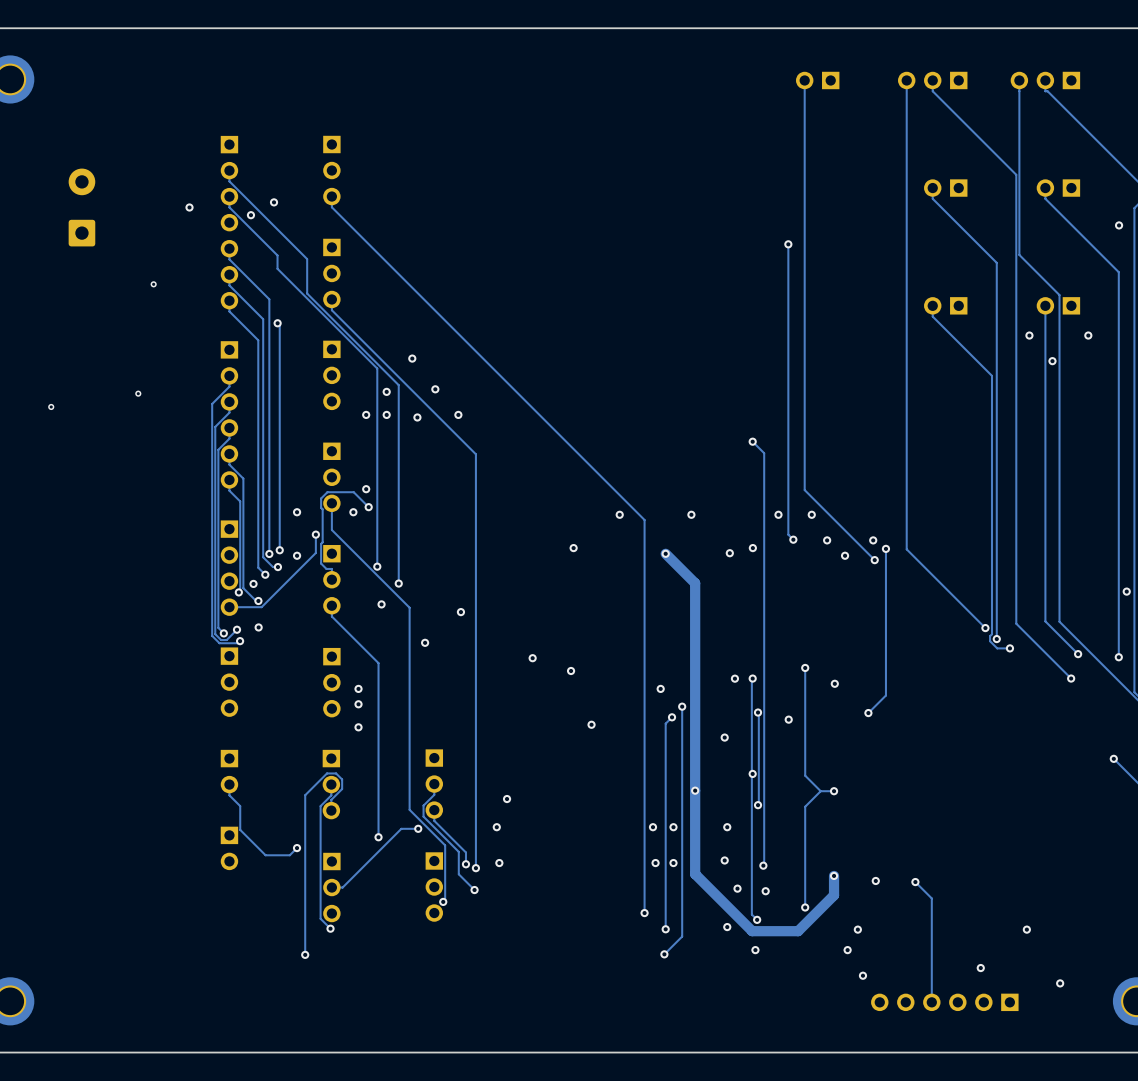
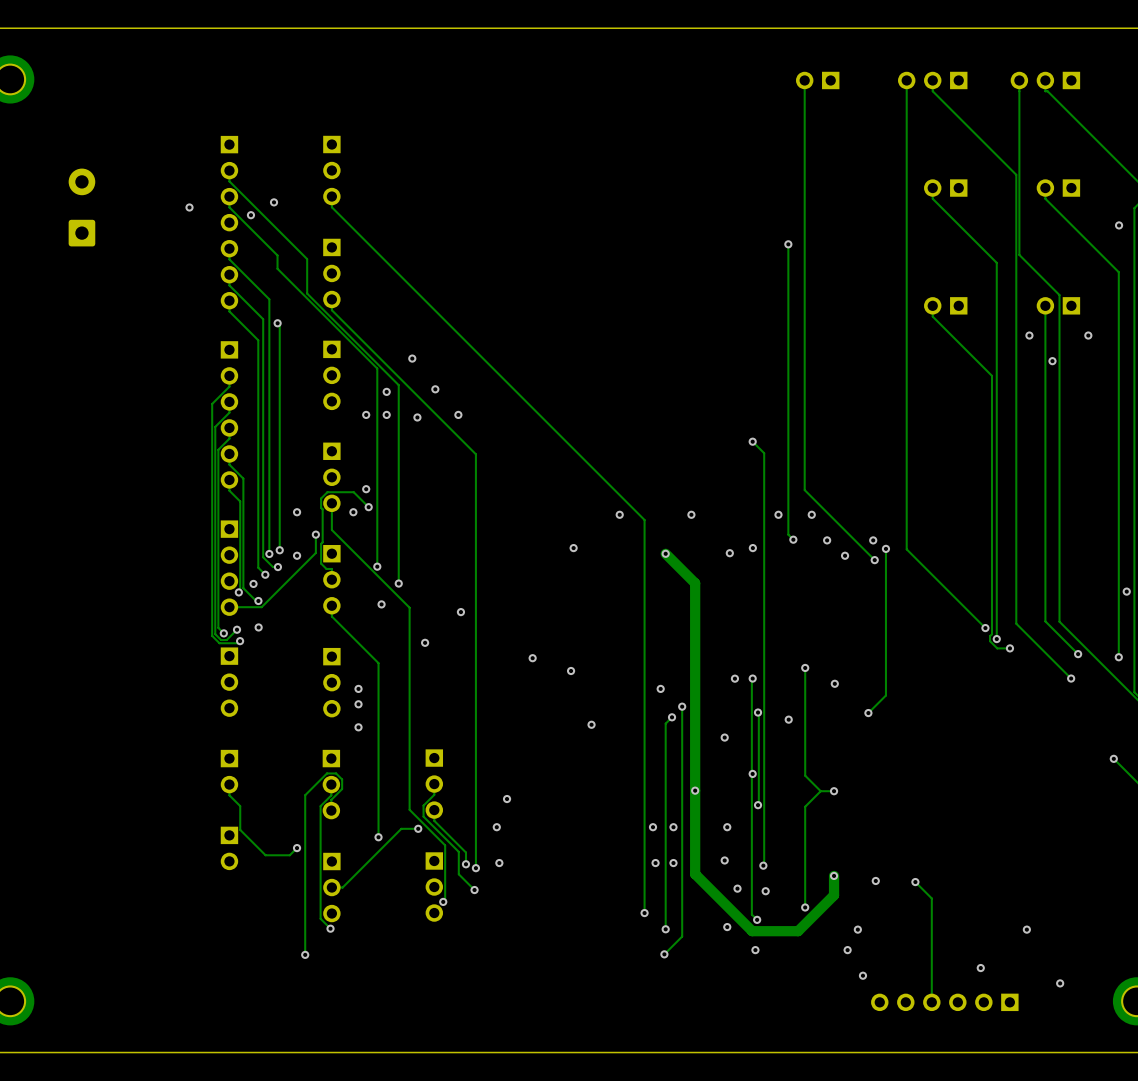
via: (153, 284) -> none
via: (138, 393) -> none
via: (51, 406) -> none

